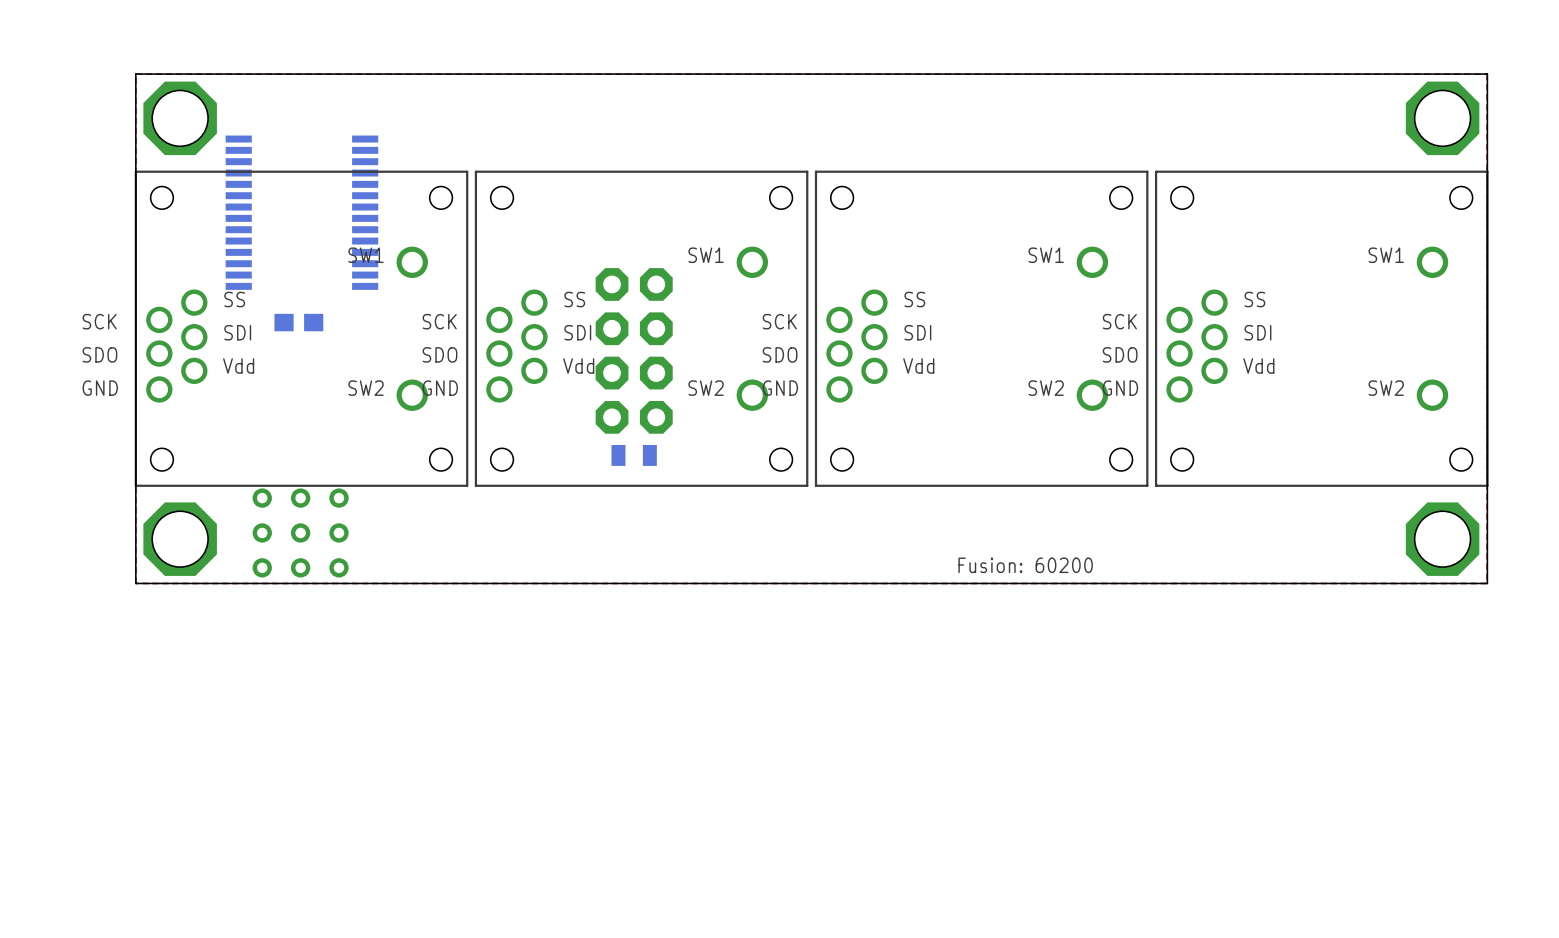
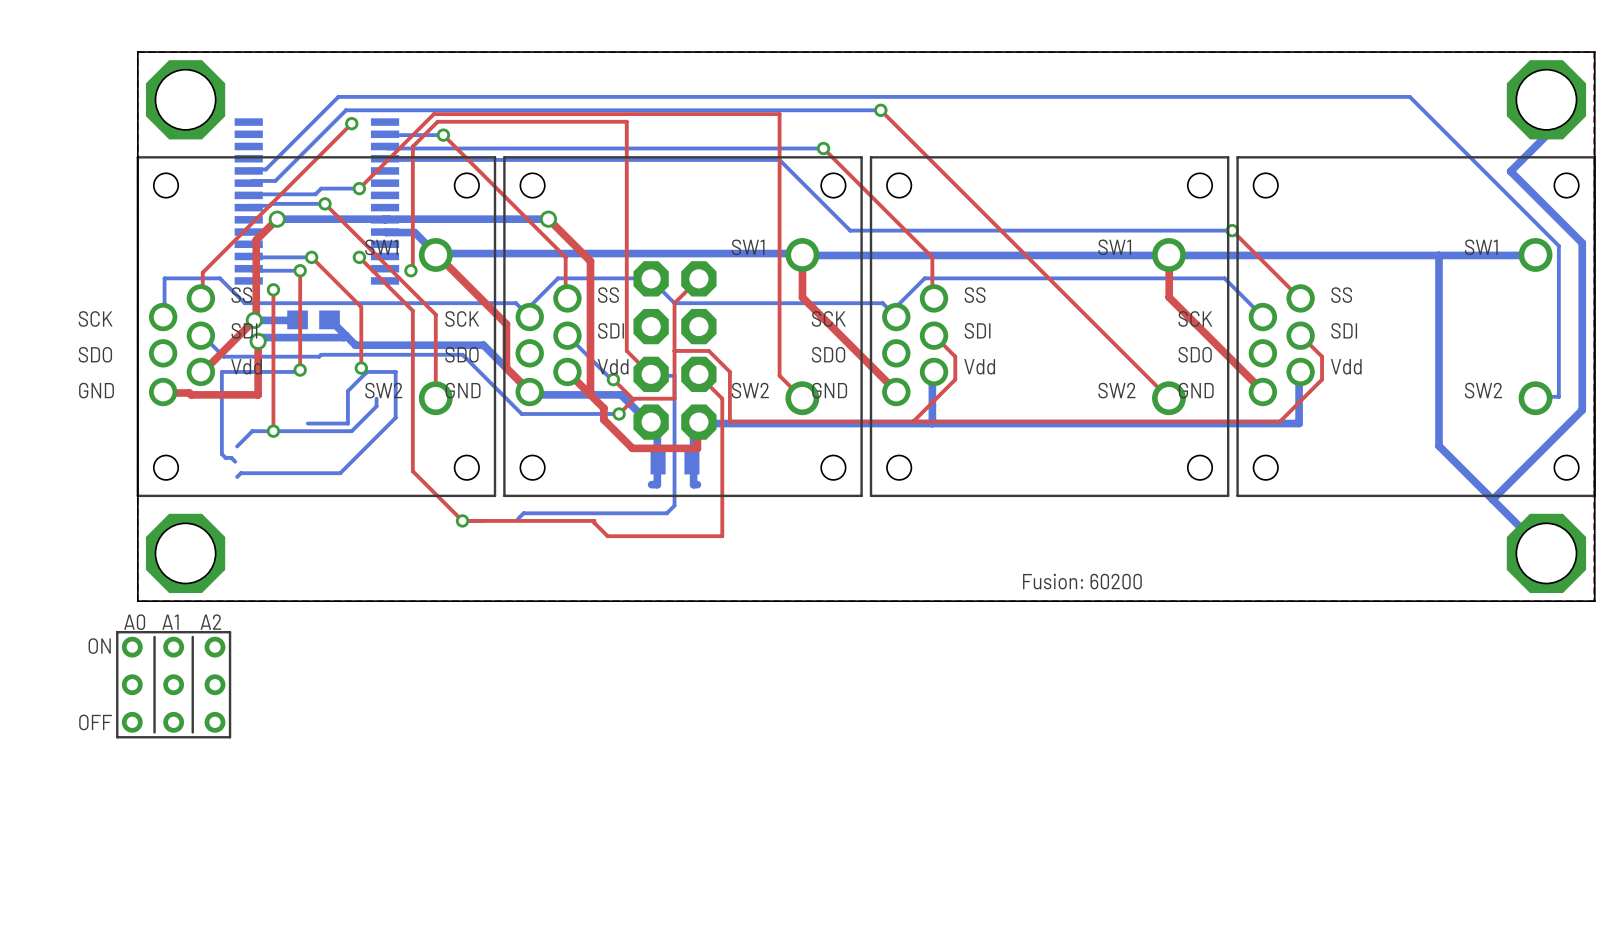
bottom track: none -> (1546, 99) (1546, 135) (1510, 171) (1582, 243) (1582, 410) (1492, 499)
bottom track: none -> (880, 110) (346, 110) (275, 180) (252, 180) (248, 183)
top track: none -> (880, 110) (1168, 398)
via: none -> (880, 110)
top track: none -> (351, 123) (202, 272) (202, 297) (200, 298)
via: none -> (351, 123)
bottom track: none -> (385, 134) (443, 135)
top track: none -> (443, 135) (565, 257) (565, 297) (567, 298)
via: none -> (443, 135)
bottom track: none -> (385, 146) (388, 148) (823, 148)
top track: none -> (823, 148) (932, 257) (932, 297) (934, 298)
via: none -> (823, 148)
bottom track: none -> (385, 158) (779, 159) (850, 230) (1232, 230)
bottom track: none -> (248, 170) (265, 169) (338, 96) (1409, 96) (1558, 245) (1558, 396) (1535, 398)
bottom track: none -> (359, 188) (321, 188) (315, 194) (248, 195)
top track: none -> (359, 188) (433, 114) (779, 114) (779, 375) (802, 398)
via: none -> (359, 188)
bottom track: none -> (325, 203) (271, 203) (269, 205) (250, 205) (248, 207)
top track: none -> (325, 203) (435, 314) (435, 398)
via: none -> (325, 203)
bottom track: none -> (277, 219) (548, 219)
top track: none -> (277, 219) (256, 240) (256, 318) (200, 371)
via: none -> (277, 219)
top track: none -> (548, 219) (590, 261) (590, 391) (588, 392)
via: none -> (548, 219)
top track: none -> (1232, 230) (1300, 298)
via: none -> (1232, 230)
bottom track: none -> (385, 232) (414, 232) (435, 254) (439, 255) (441, 253) (1535, 254)
top track: none -> (435, 254) (506, 324) (506, 368) (529, 392)
top track: none -> (802, 254) (802, 297) (896, 392)
top track: none -> (1168, 254) (1169, 297) (1262, 392)
bottom track: none -> (1439, 255) (1439, 445) (1546, 553)
bottom track: none -> (248, 256) (311, 257)
top track: none -> (311, 257) (361, 307) (361, 368)
via: none -> (311, 257)
top track: none -> (359, 257) (412, 310) (412, 471) (462, 520) (594, 520) (607, 536) (722, 536) (722, 398) (698, 374)
via: none -> (359, 257)
bottom track: none -> (248, 268) (252, 270) (300, 270)
top track: none -> (300, 270) (300, 370)
via: none -> (300, 270)
top track: none -> (410, 270) (412, 268) (412, 146) (437, 121) (626, 121) (626, 350) (651, 374)
via: none -> (410, 270)
top track: none -> (698, 278) (674, 303) (674, 398) (634, 398) (619, 413)
top track: none -> (273, 289) (273, 431)
via: none -> (273, 289)
bottom track: none -> (163, 317) (164, 278) (219, 278) (244, 303) (516, 303) (529, 317) (525, 310) (558, 278) (649, 278) (674, 303) (882, 303) (896, 317) (892, 310) (924, 278) (1224, 278) (1262, 317)
bottom track: none -> (297, 319) (254, 320)
bottom track: none -> (329, 319) (355, 345) (483, 345) (531, 394) (621, 394) (647, 421) (657, 423) (657, 484) (651, 484)
via: none -> (254, 320)
bottom track: none -> (200, 335) (223, 356) (462, 354) (521, 413) (619, 413)
bottom track: none -> (346, 335) (344, 337) (261, 337) (258, 341)
bottom track: none -> (567, 335) (613, 379)
top track: none -> (934, 335) (955, 356) (955, 379) (913, 421) (729, 421) (729, 371) (708, 350) (674, 350)
top track: none -> (1300, 335) (1322, 356) (1322, 379) (1280, 421) (914, 420)
top track: none -> (258, 341) (258, 394) (191, 394) (189, 392) (163, 392)
via: none -> (258, 341)
via: none -> (361, 368)
via: none -> (300, 370)
bottom track: none -> (303, 371) (221, 371) (221, 454) (235, 461)
top track: none -> (567, 371) (603, 408) (603, 419) (632, 448) (697, 448) (698, 422)
bottom track: none -> (934, 371) (932, 371) (932, 423)
bottom track: none -> (1300, 371) (1299, 371) (1299, 423) (698, 422) (693, 423) (693, 459) (691, 463) (693, 463) (693, 484) (697, 484)
bottom track: none -> (651, 374) (674, 375) (674, 505) (666, 513) (523, 513) (517, 519)
top track: none -> (613, 379) (633, 399)
via: none -> (613, 379)
bottom track: none -> (376, 398) (376, 406) (351, 431) (252, 431) (237, 446)
via: none -> (619, 413)
bottom track: none -> (307, 423) (347, 423) (347, 391) (367, 371) (395, 371) (395, 417) (340, 473) (240, 473) (237, 477)
via: none -> (273, 431)
via: none -> (462, 520)
part side: bottom (300, 532) -> top (173, 684)

